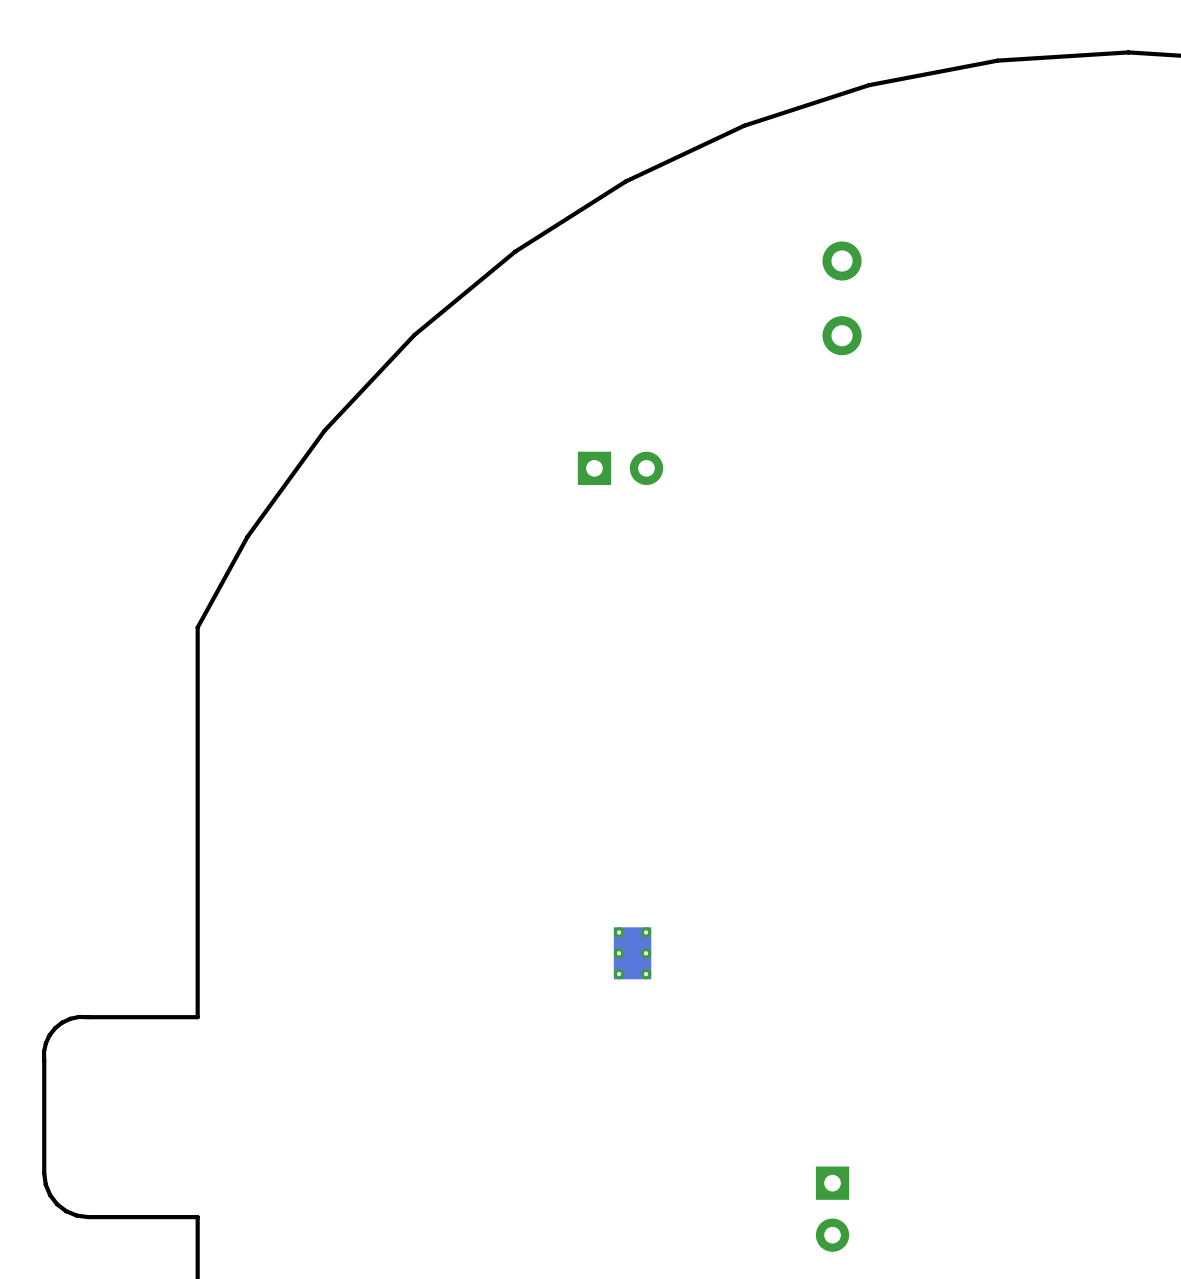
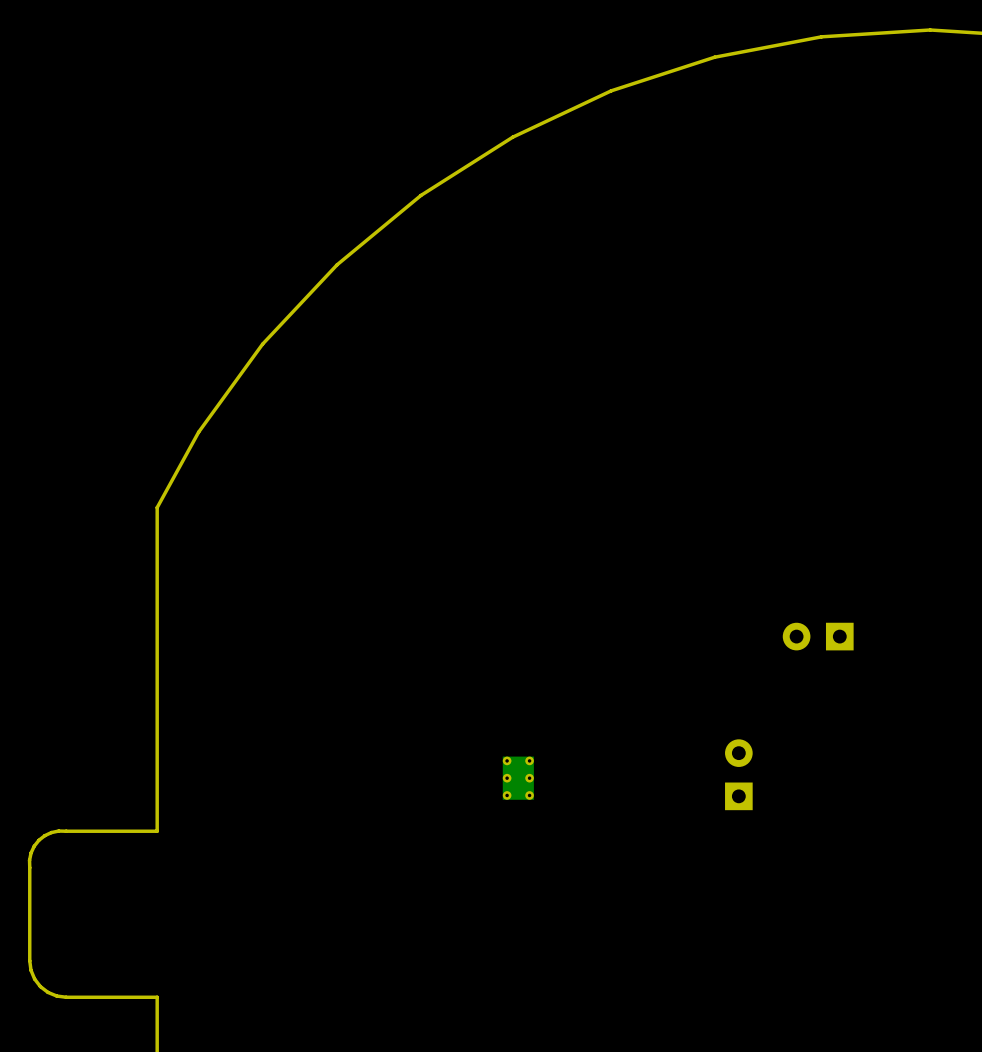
part: (842, 261) -> none
part: (842, 335) -> none
part: (620, 468) -> none
part: none -> (818, 636)
part: none -> (738, 774)
part: (832, 1209) -> none

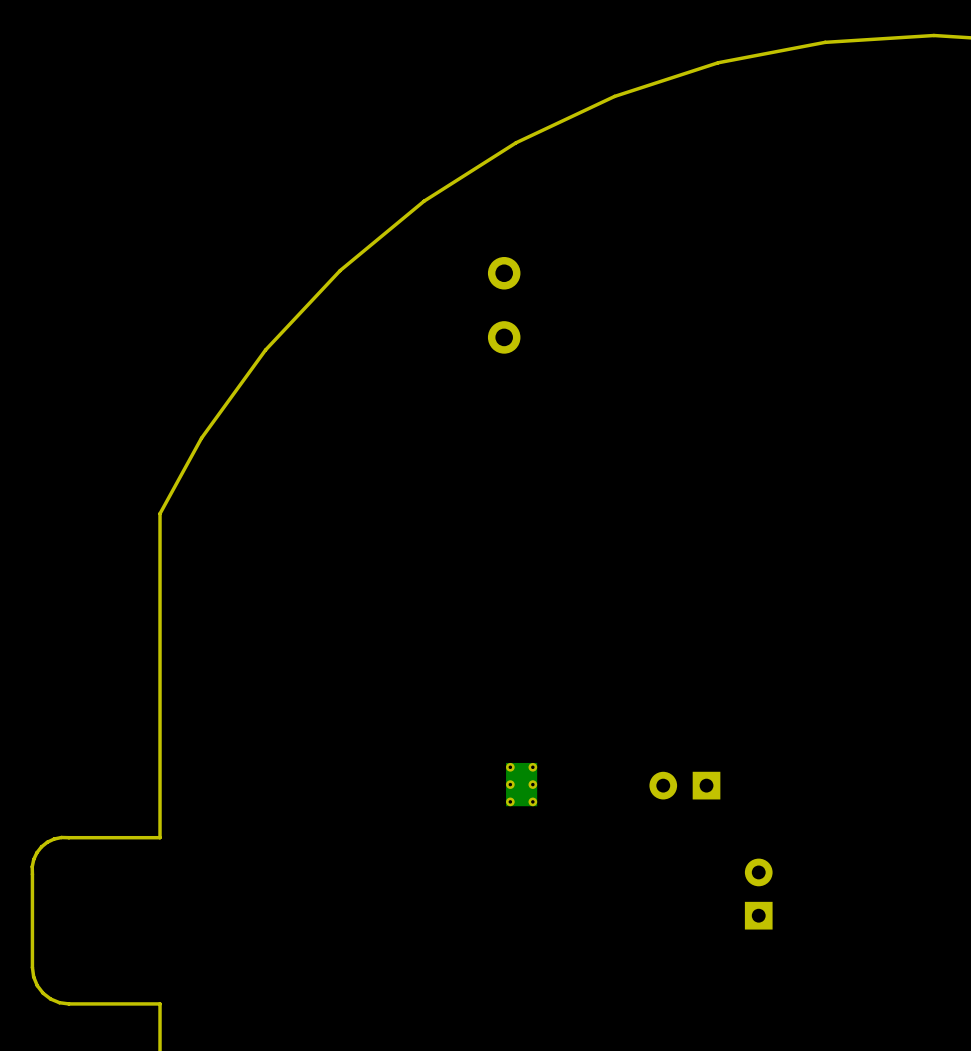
part: none -> (504, 273)
part: none -> (504, 337)
part: (818, 636) -> none
part: (738, 774) -> none
part: none -> (684, 785)
part: none -> (758, 894)

